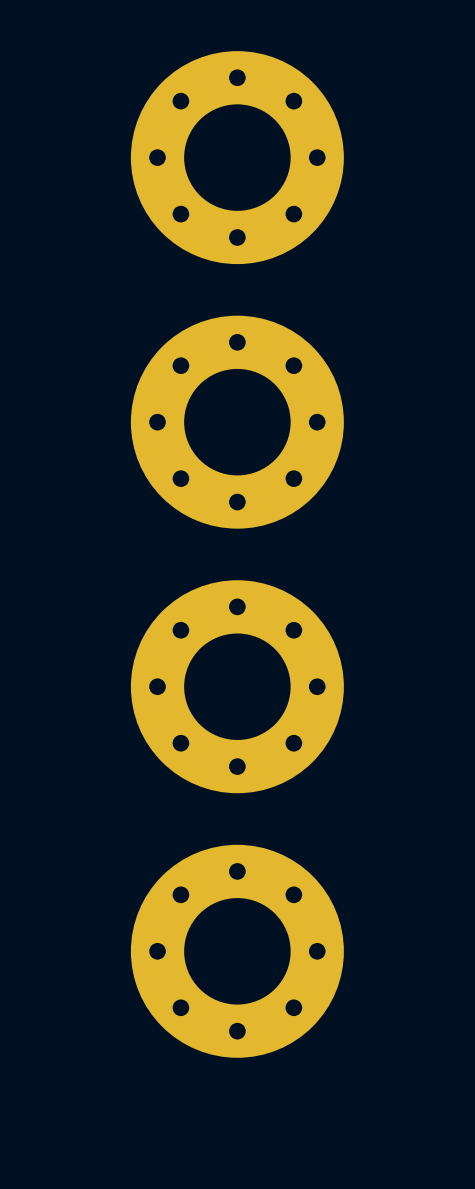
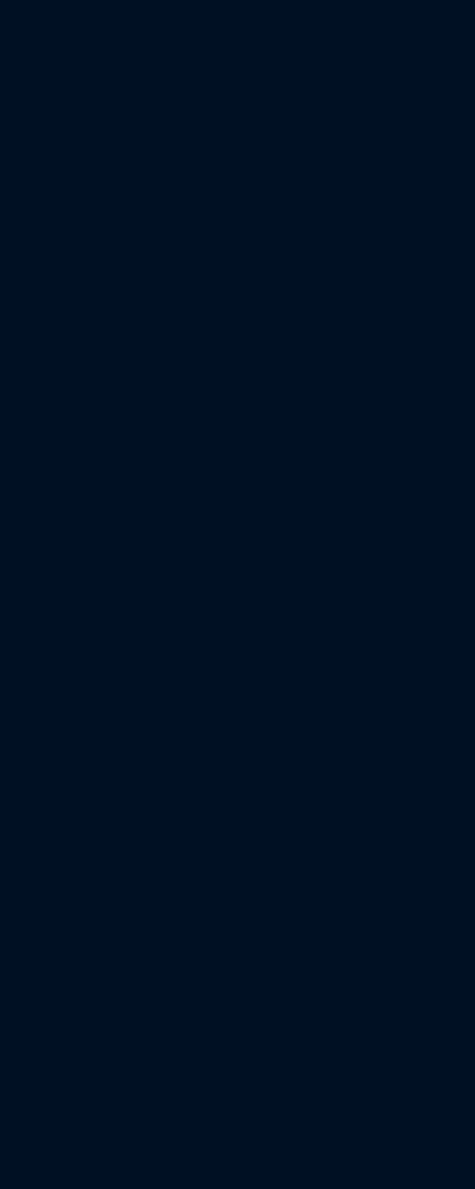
part: (237, 157) -> none
part: (237, 422) -> none
part: (237, 686) -> none
part: (237, 951) -> none

